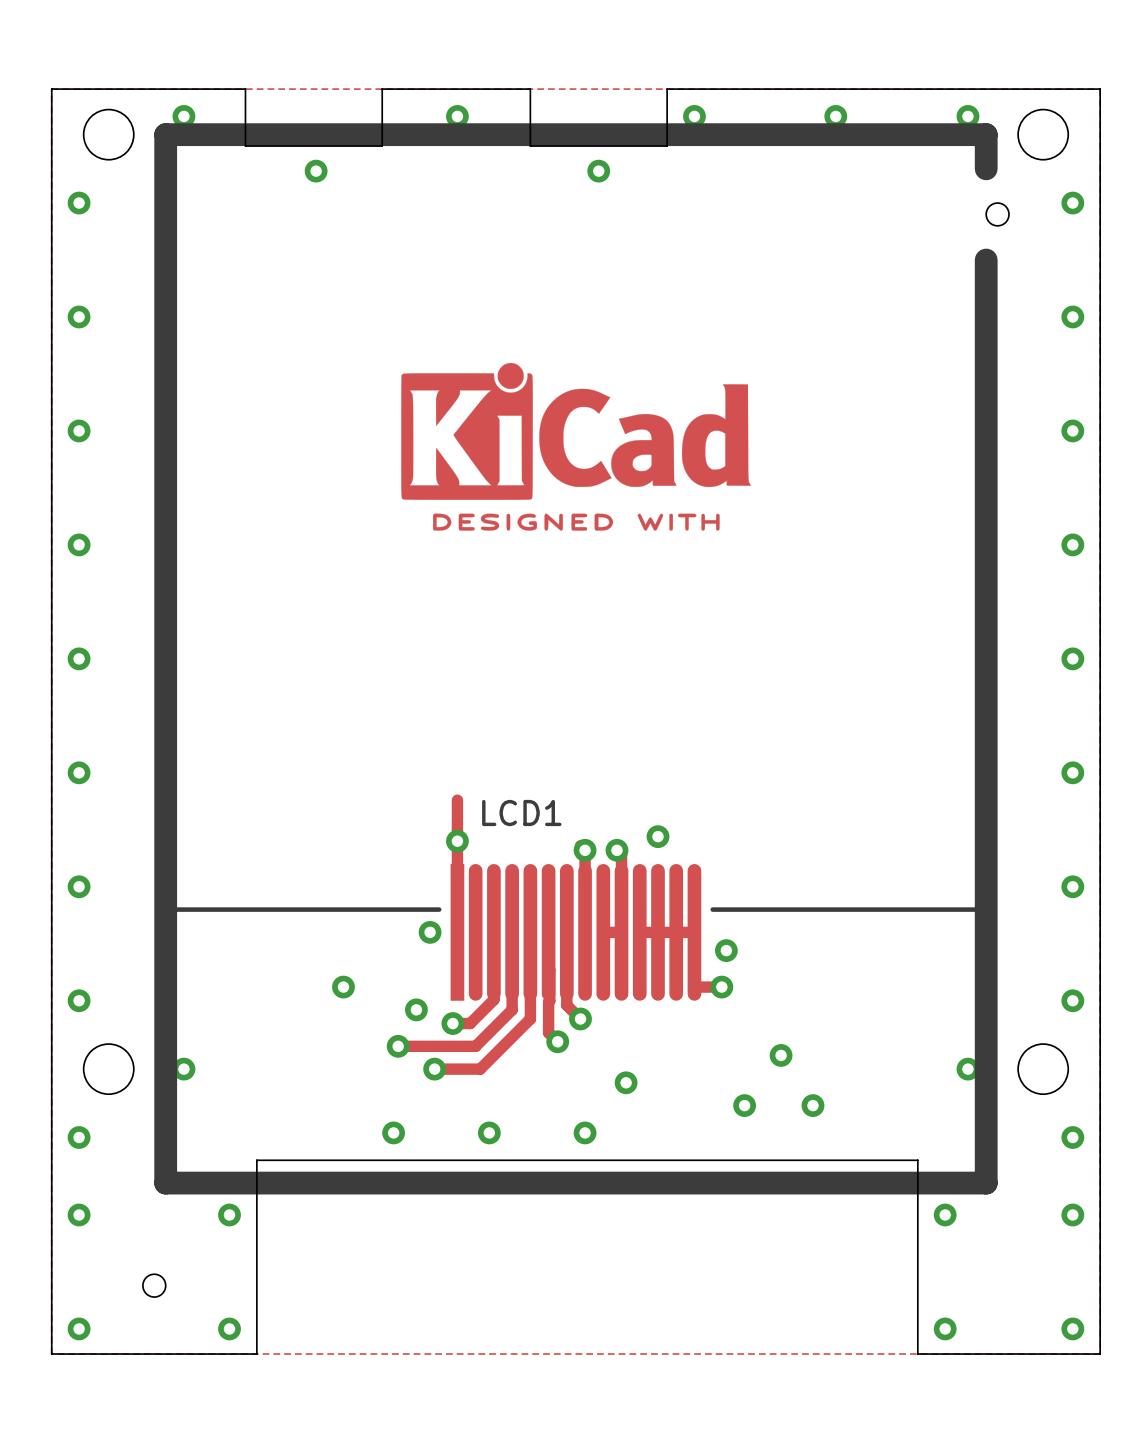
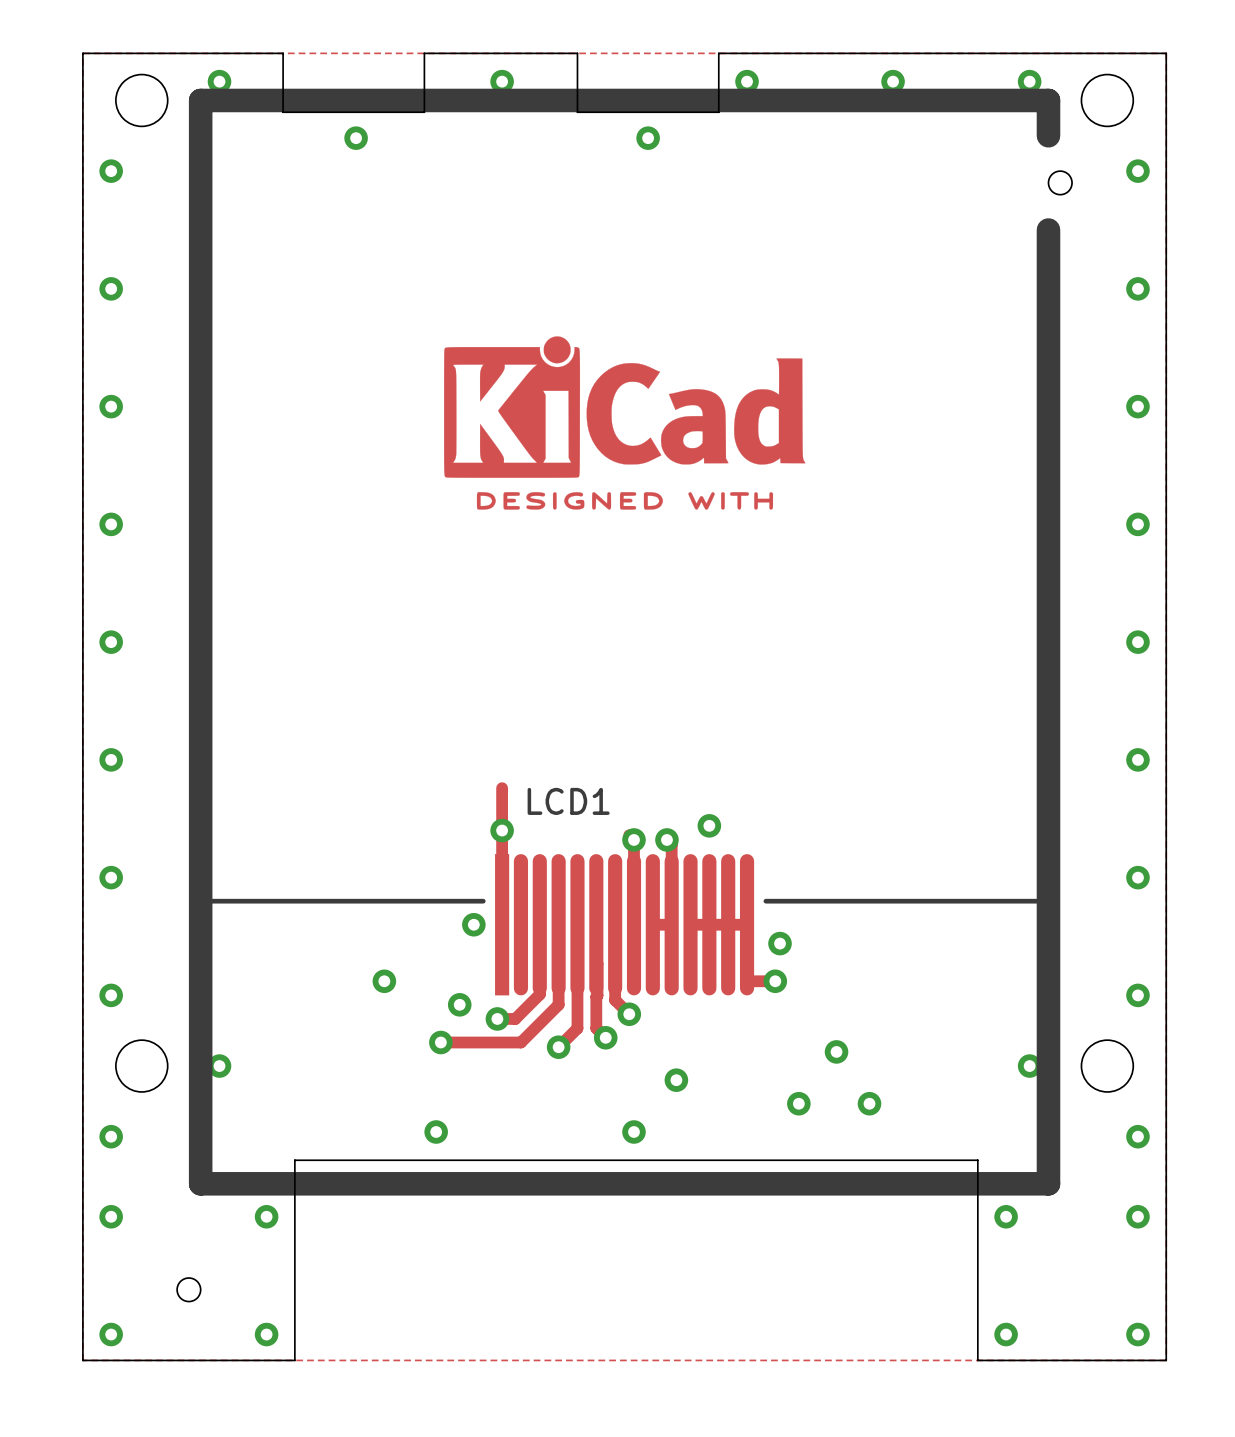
track: (530, 1018) (480, 1069) (434, 1069) -> (577, 1014) (577, 1028) (558, 1047)
via: none -> (558, 1047)
via: (434, 1069) -> none
via: (489, 1132) -> none

